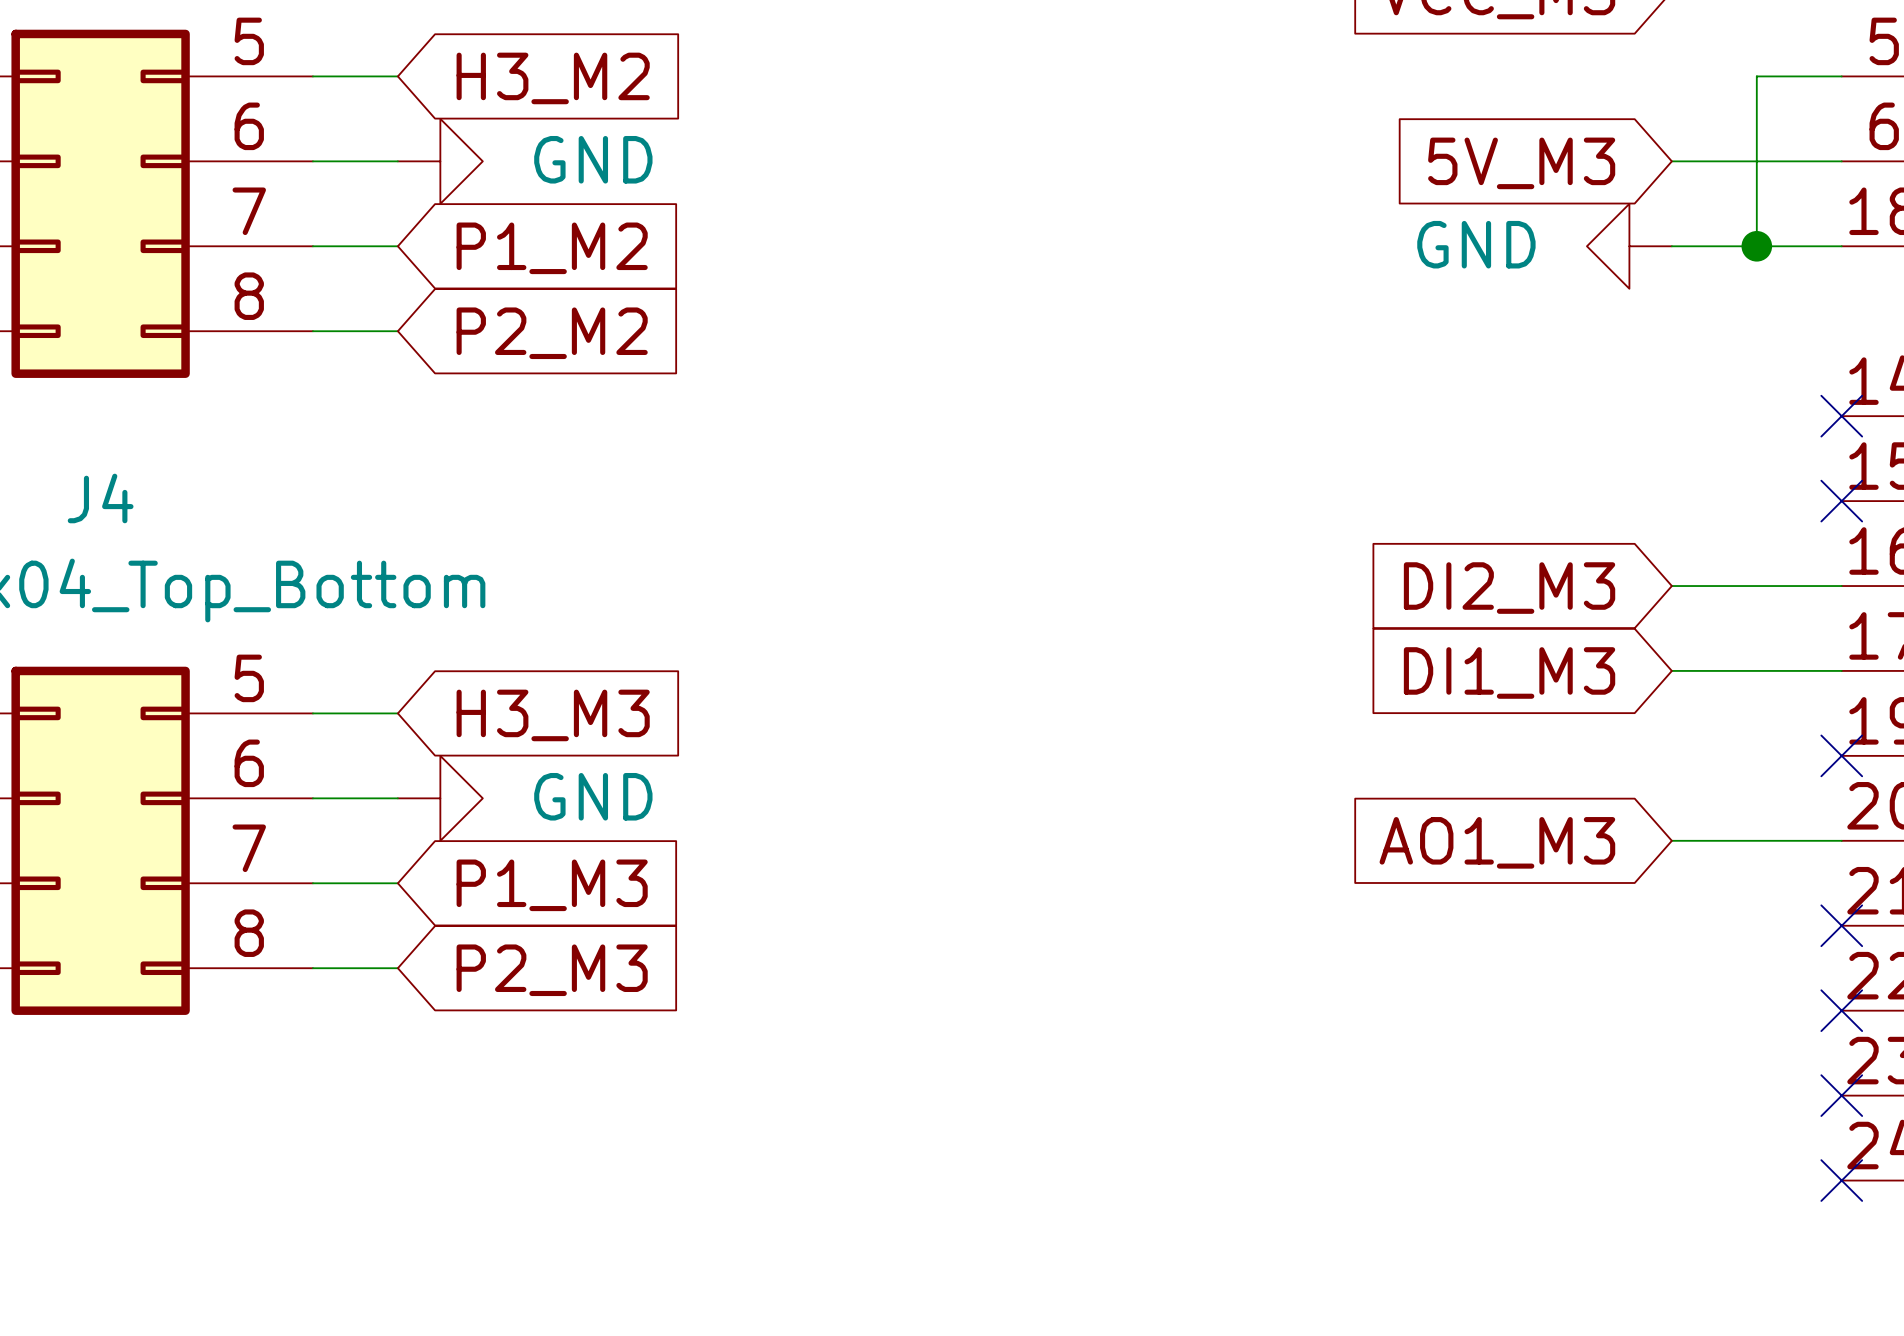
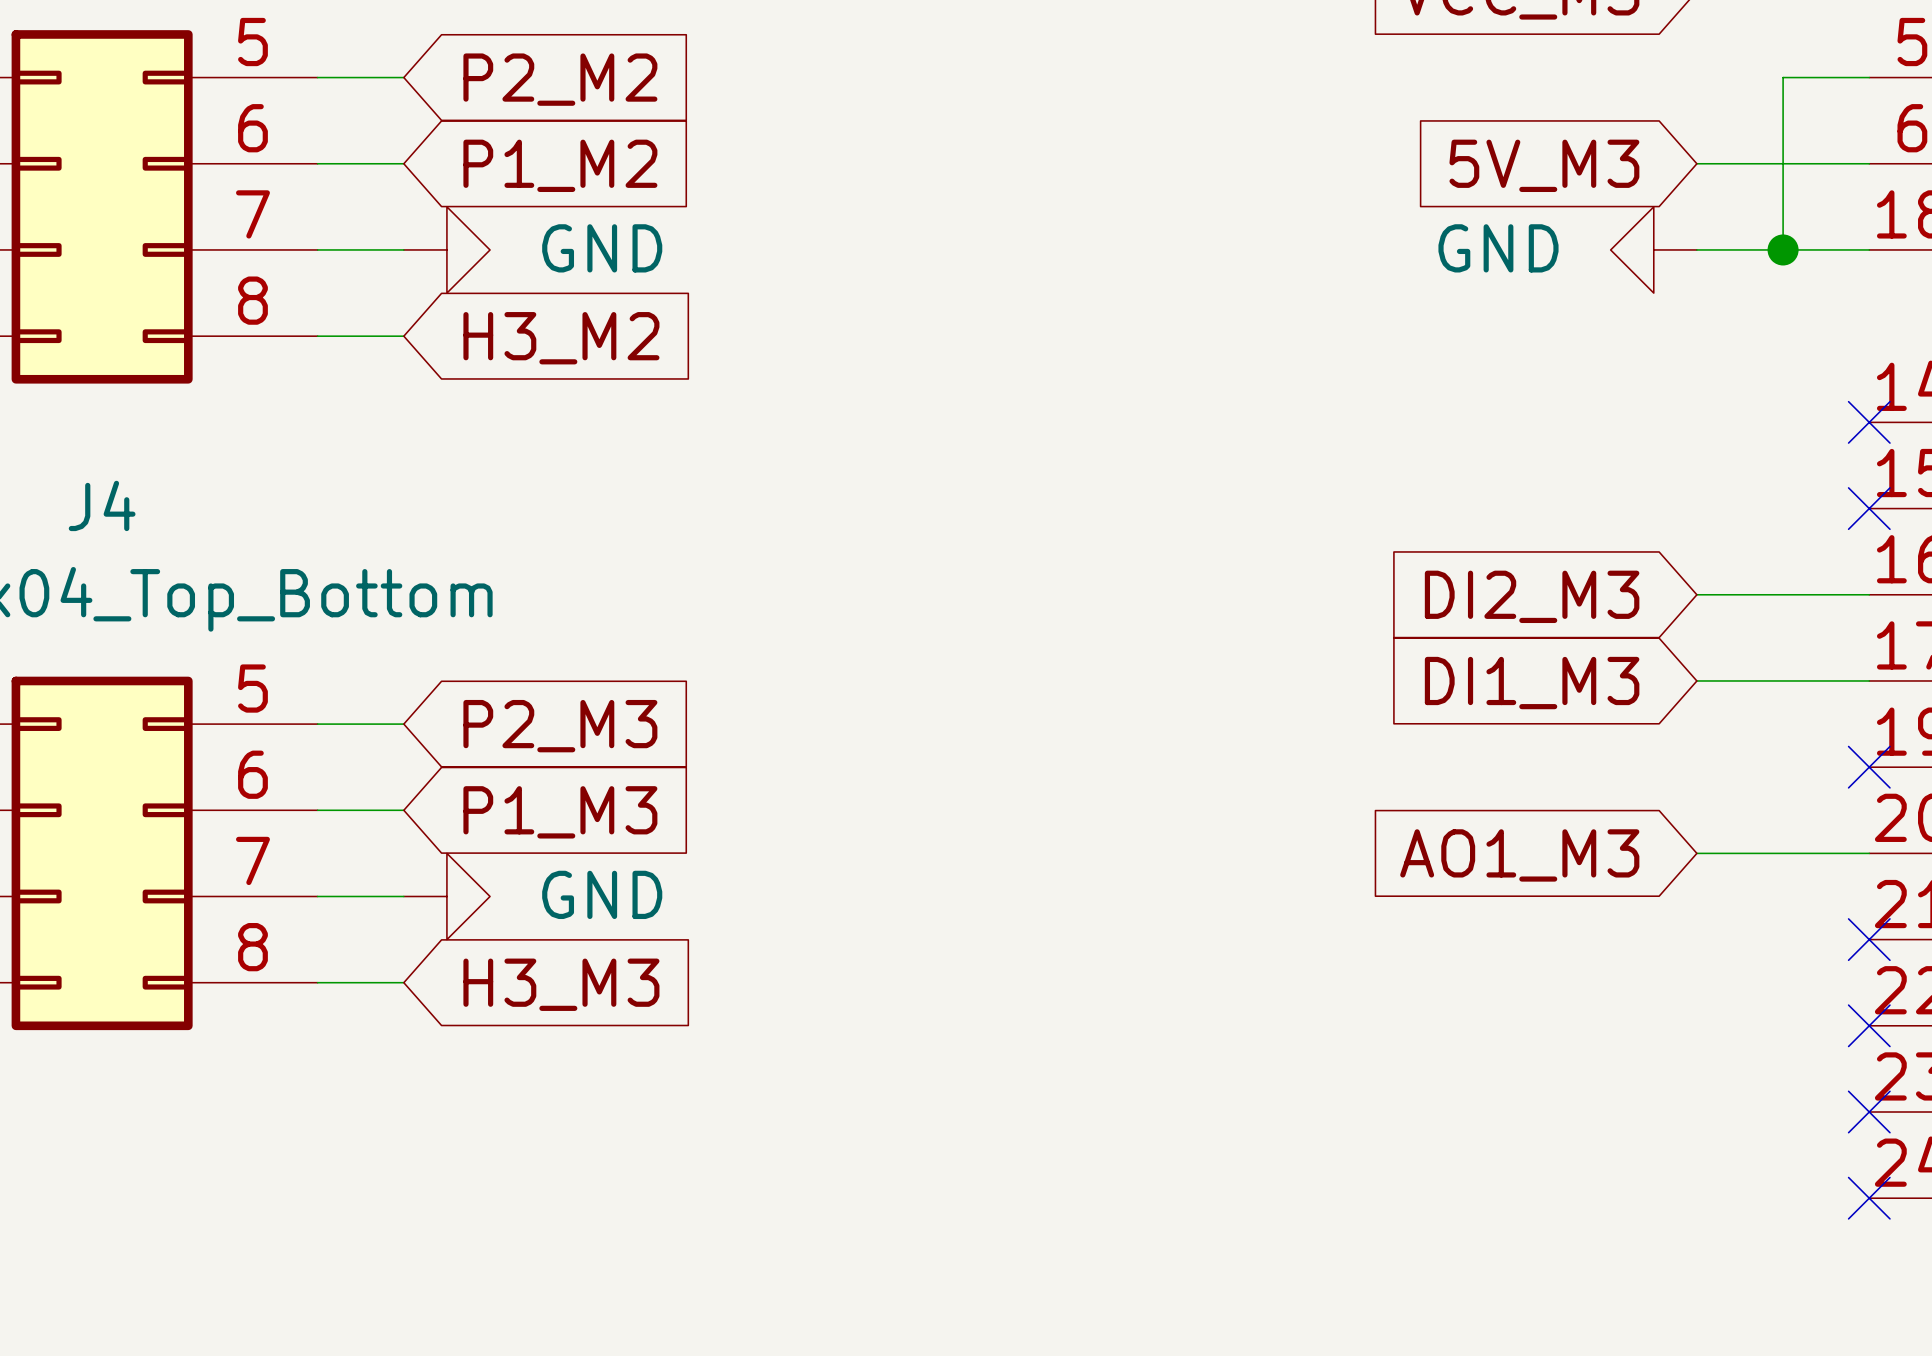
global label: H3_M2 (553, 78) -> P2_M2 (560, 79)
power symbol position: GND (440, 161) -> GND (446, 249)
global label position: P1_M2 (552, 248) -> P1_M2 (560, 165)
global label: P2_M2 (552, 333) -> H3_M2 (561, 338)
global label: H3_M3 (553, 715) -> P2_M3 (560, 726)
power symbol position: GND (440, 798) -> GND (446, 896)
global label position: P1_M3 (552, 885) -> P1_M3 (560, 812)
global label: P2_M3 (552, 970) -> H3_M3 (561, 984)

